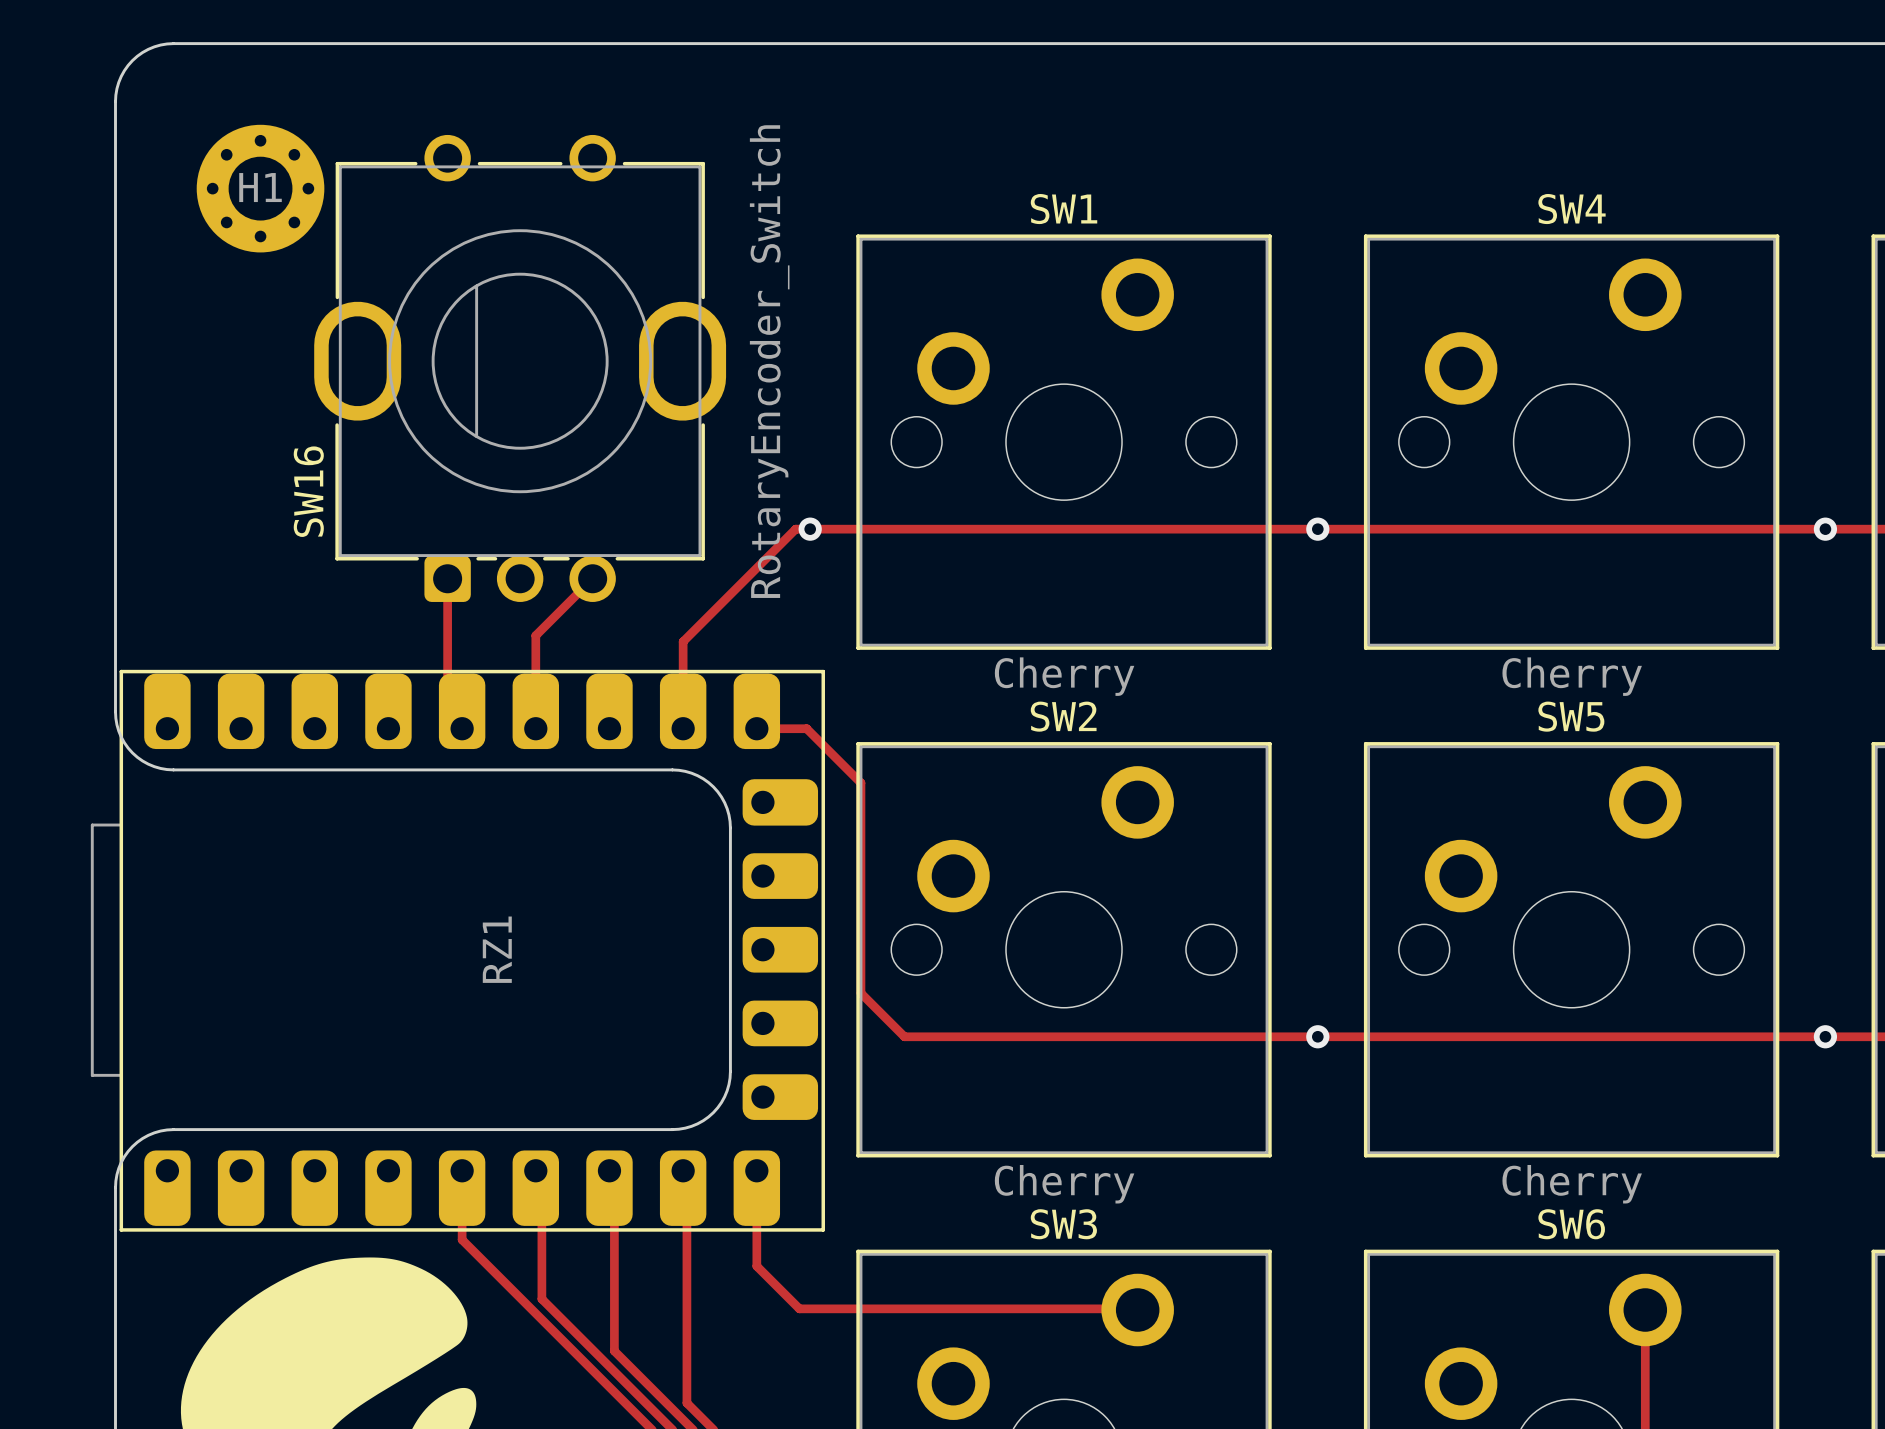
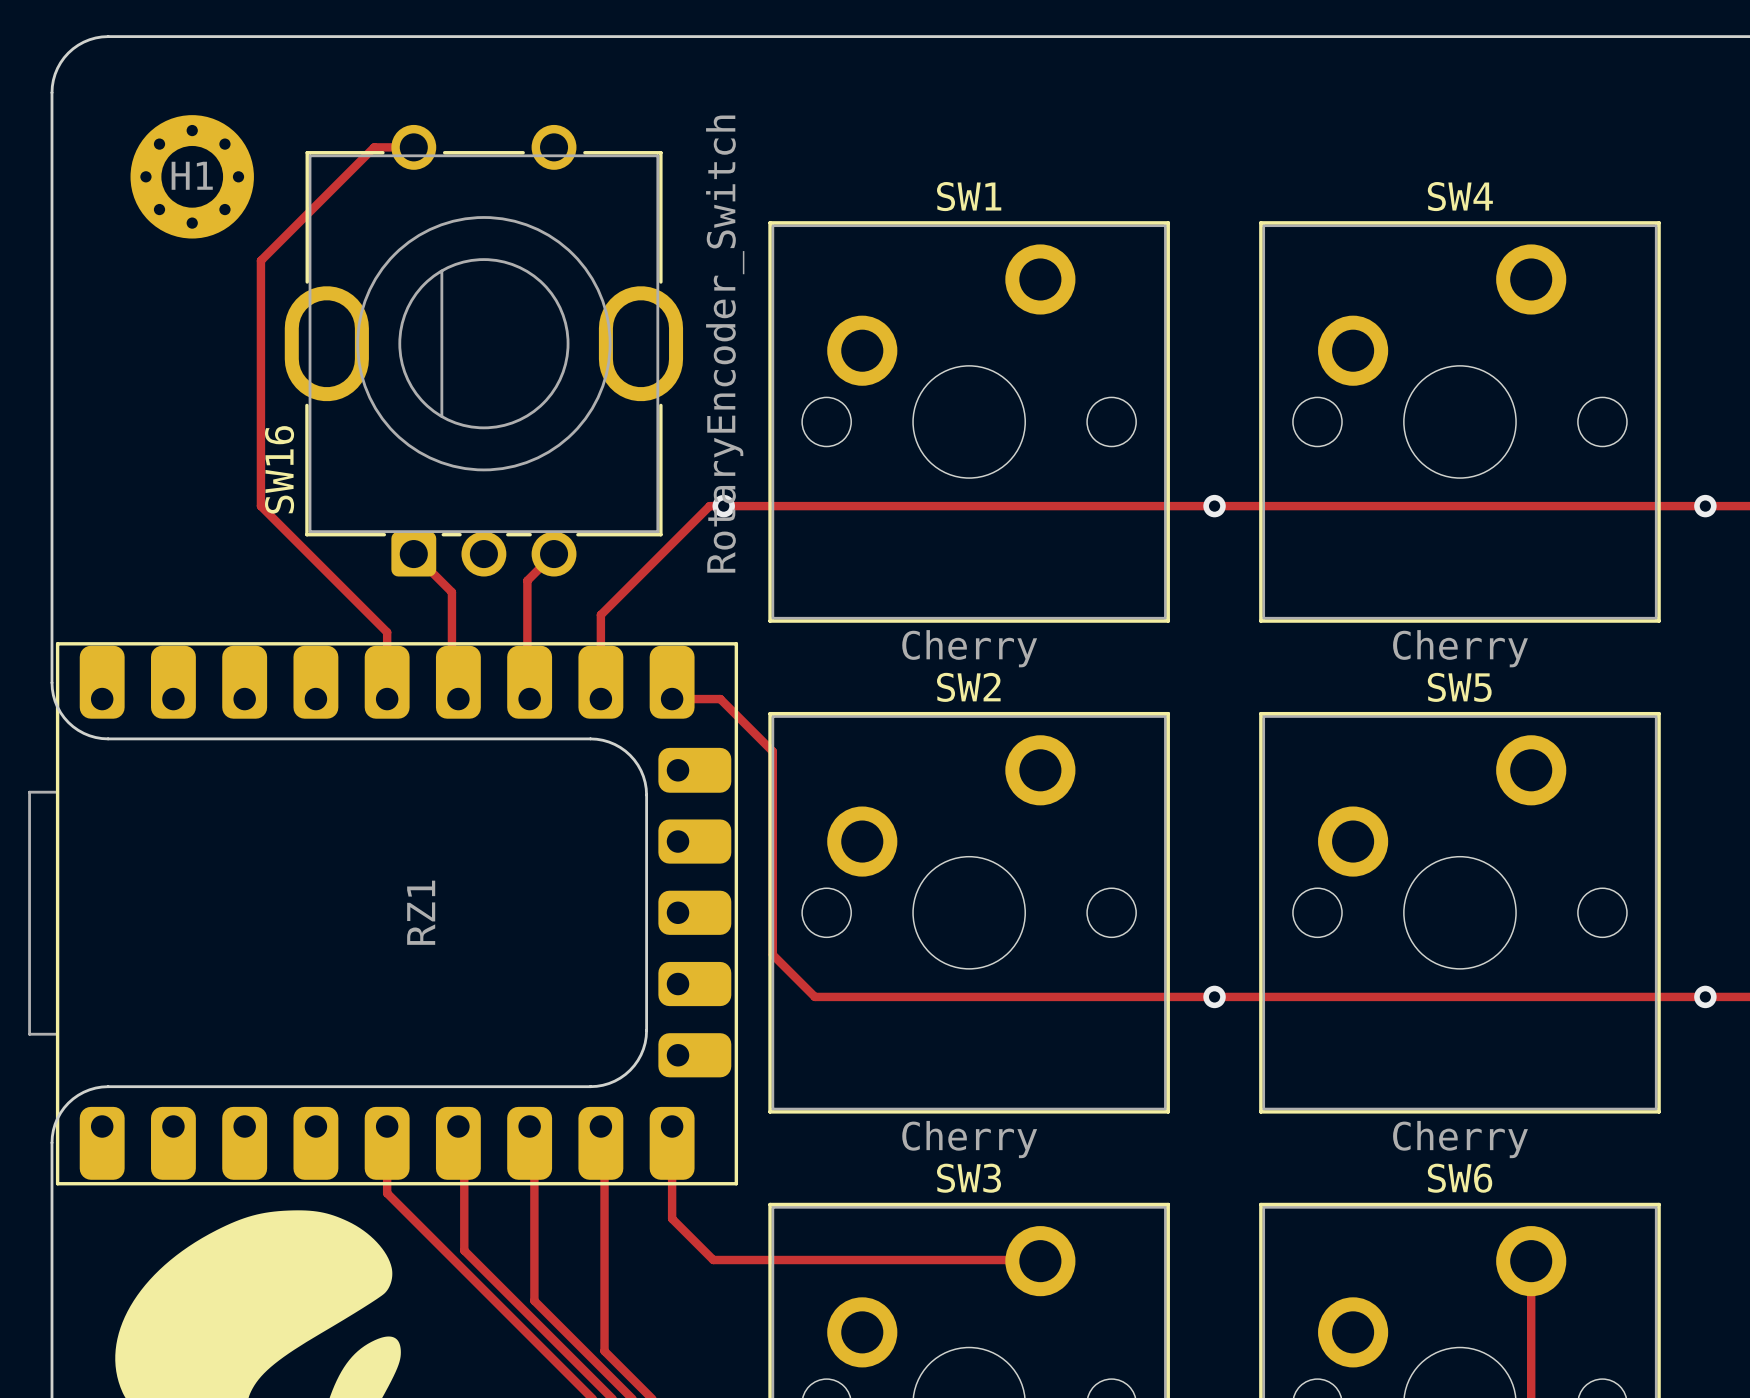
SW16 position: (520, 368) -> (483, 350)
track: (447, 578) (447, 714) (462, 728) -> (413, 147) (374, 147) (260, 260) (260, 506) (387, 632) (387, 699)
track: none -> (413, 554) (451, 592) (451, 692)
track: (592, 578) (535, 635) (535, 728) -> none
track: none -> (554, 554) (527, 580) (527, 696)

